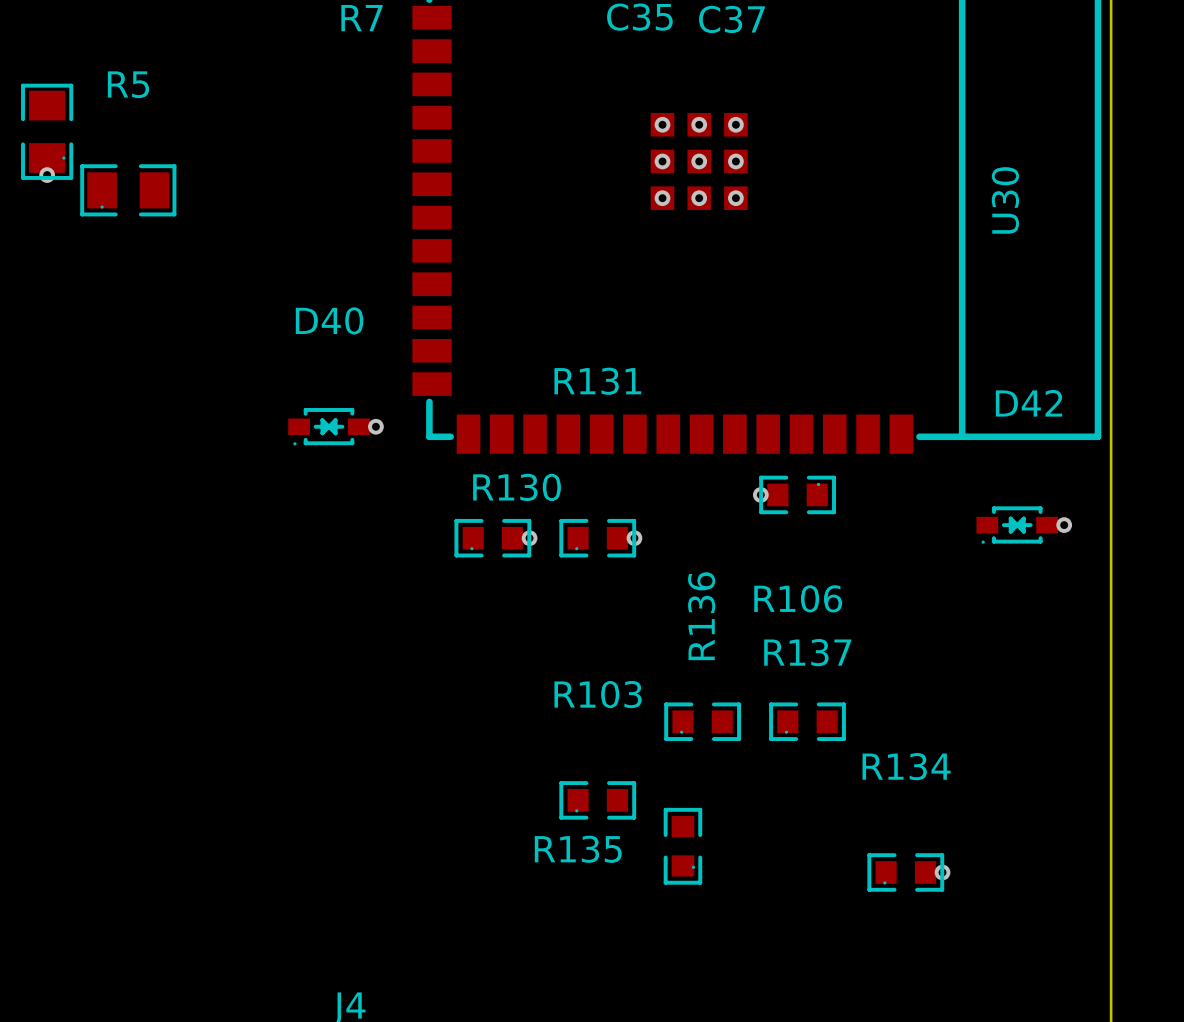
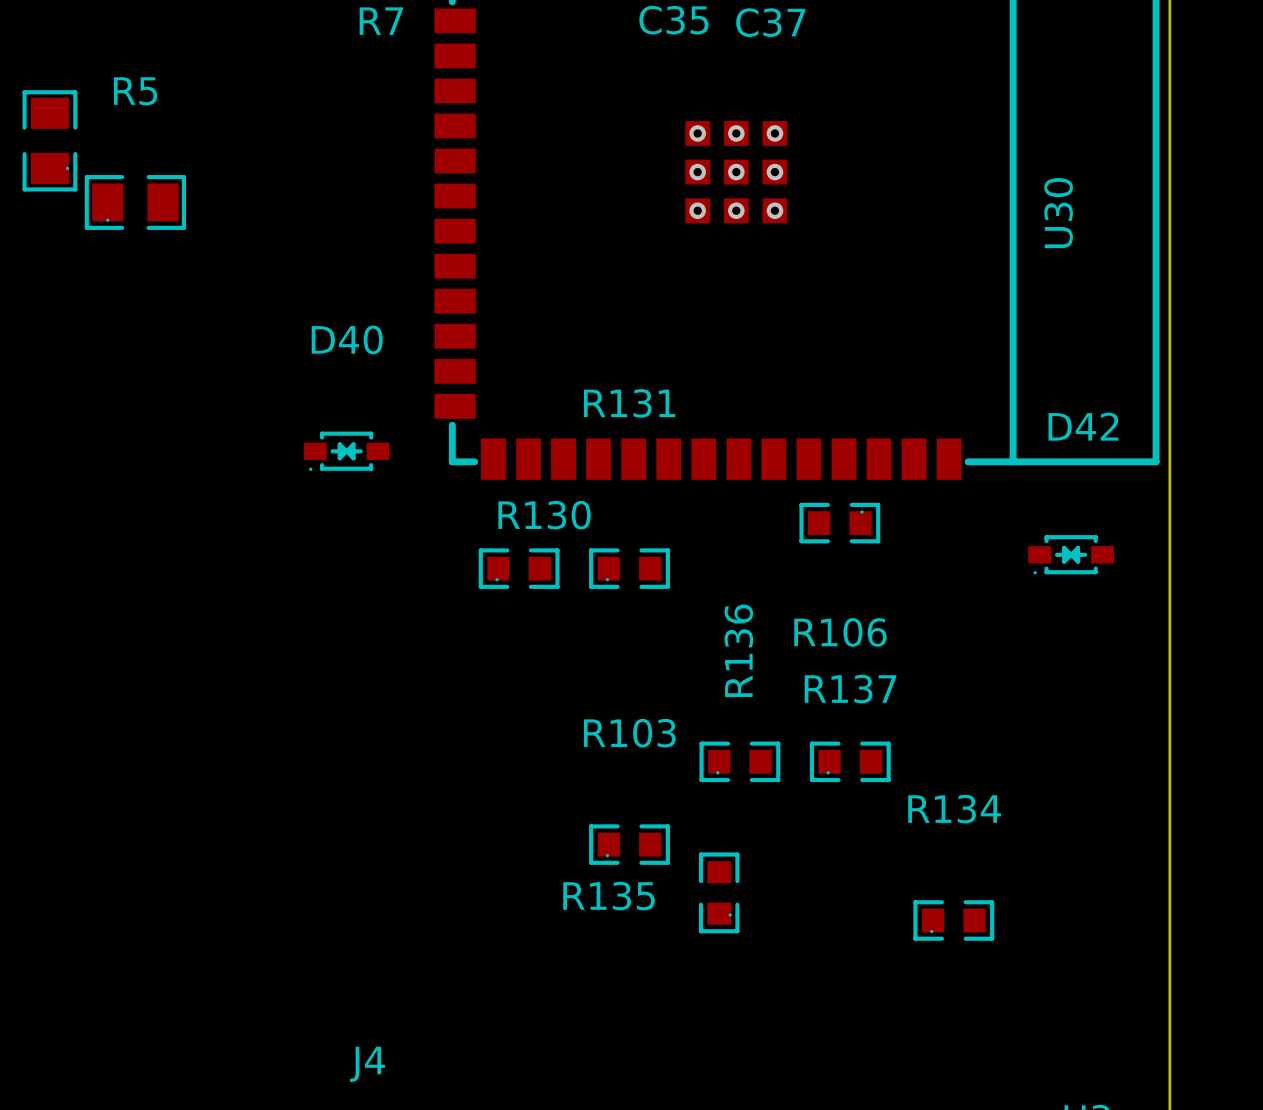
via: (47, 175) -> none
via: (375, 426) -> none
via: (760, 494) -> none
via: (1064, 525) -> none
via: (529, 538) -> none
via: (634, 538) -> none
via: (942, 872) -> none

